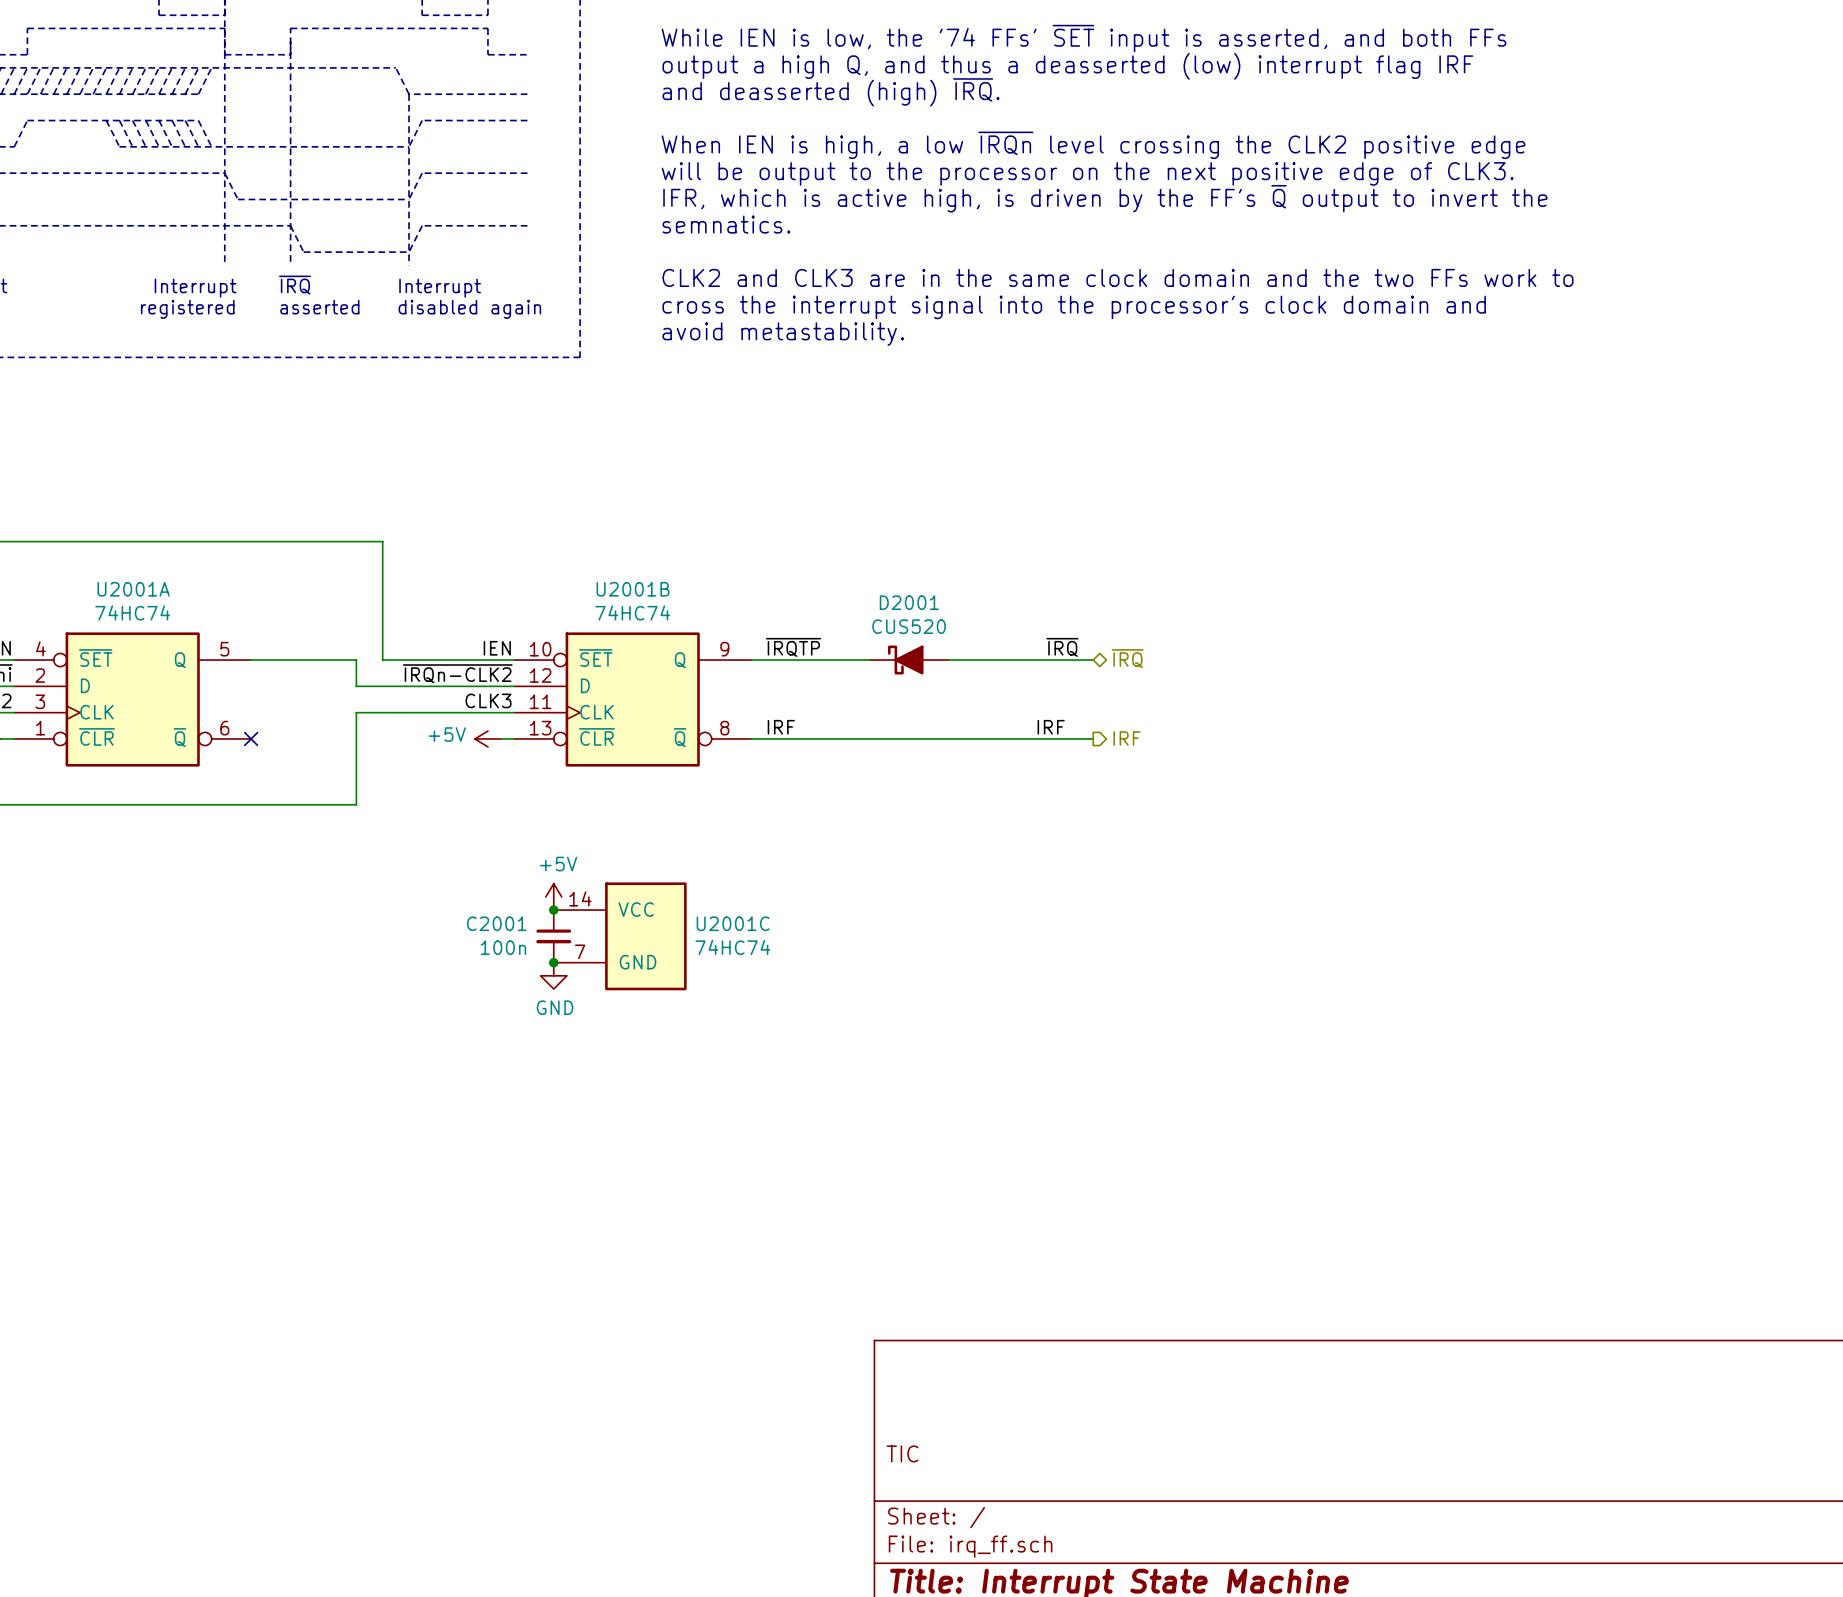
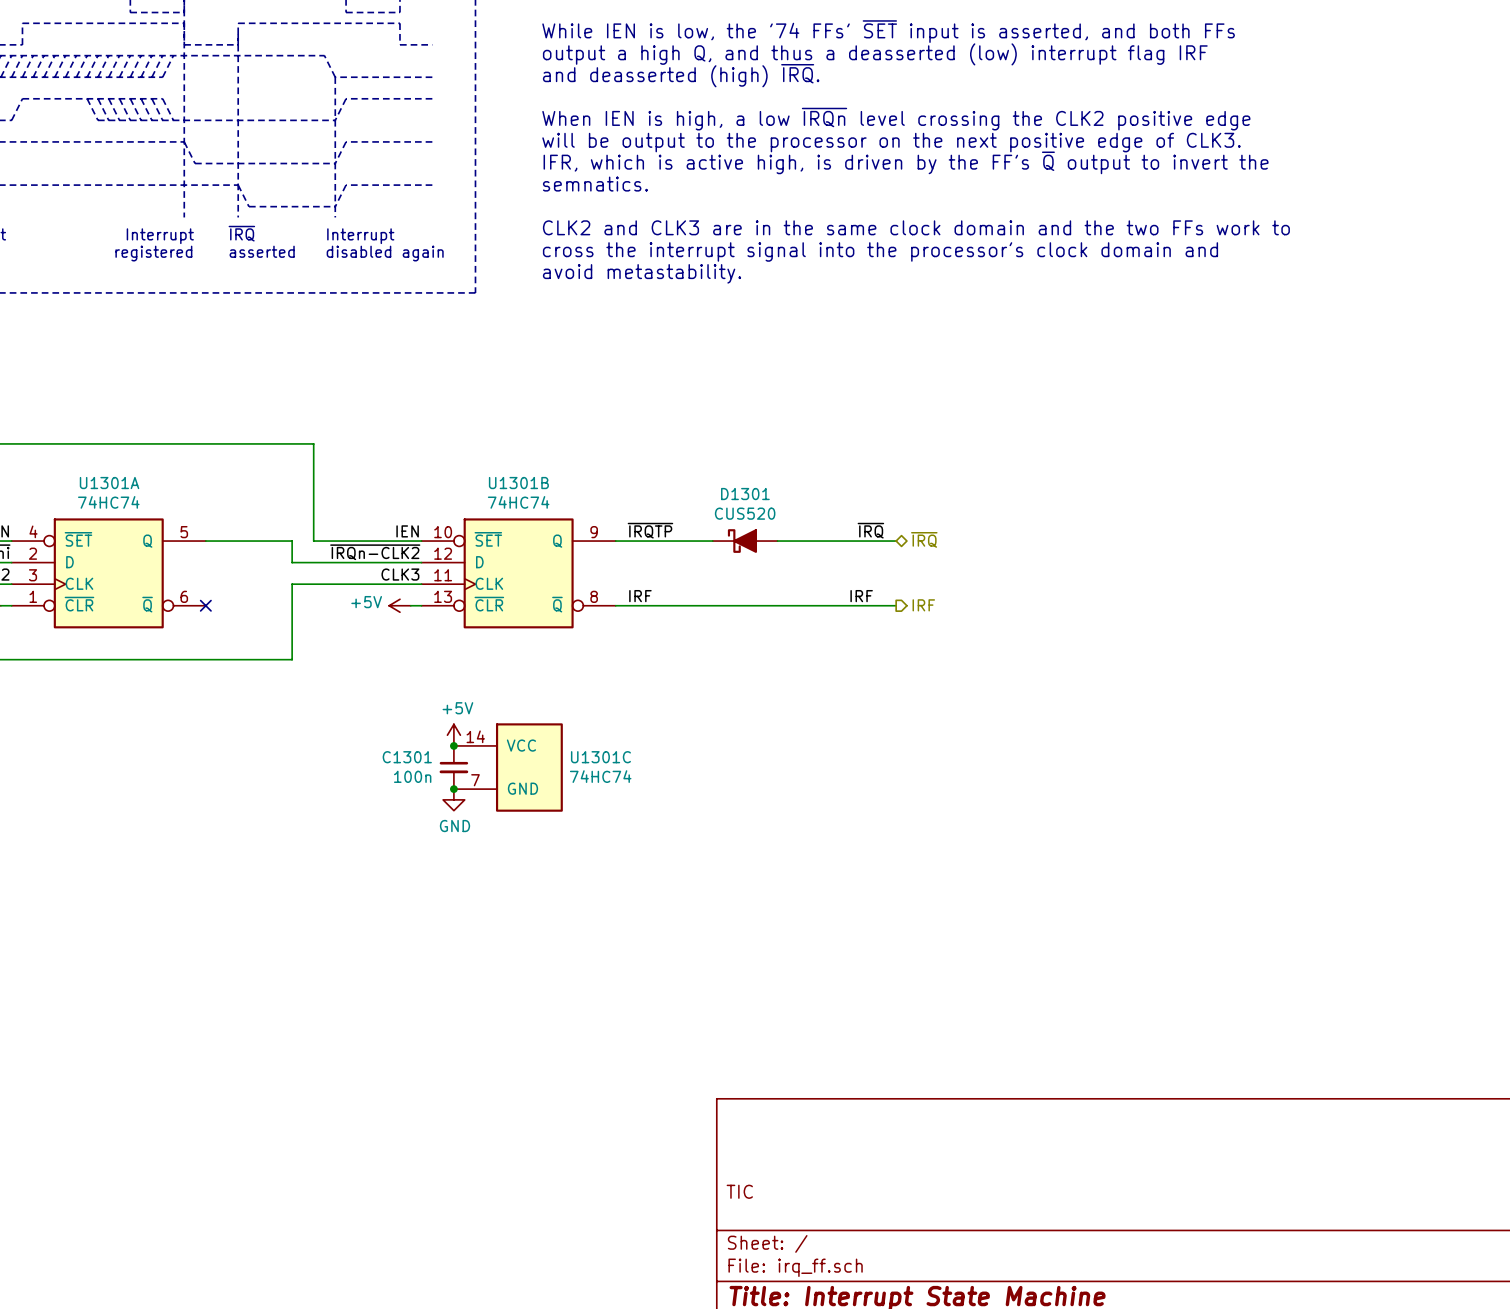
U2001A name: U2001A (133, 589) -> U1301A (109, 483)
U2001B name: U2001B (633, 589) -> U1301B (518, 483)
D2001 name: D2001 (909, 602) -> D1301 (745, 494)
C2001 name: C2001 (496, 923) -> C1301 (407, 757)
U2001C name: U2001C (733, 923) -> U1301C (600, 757)

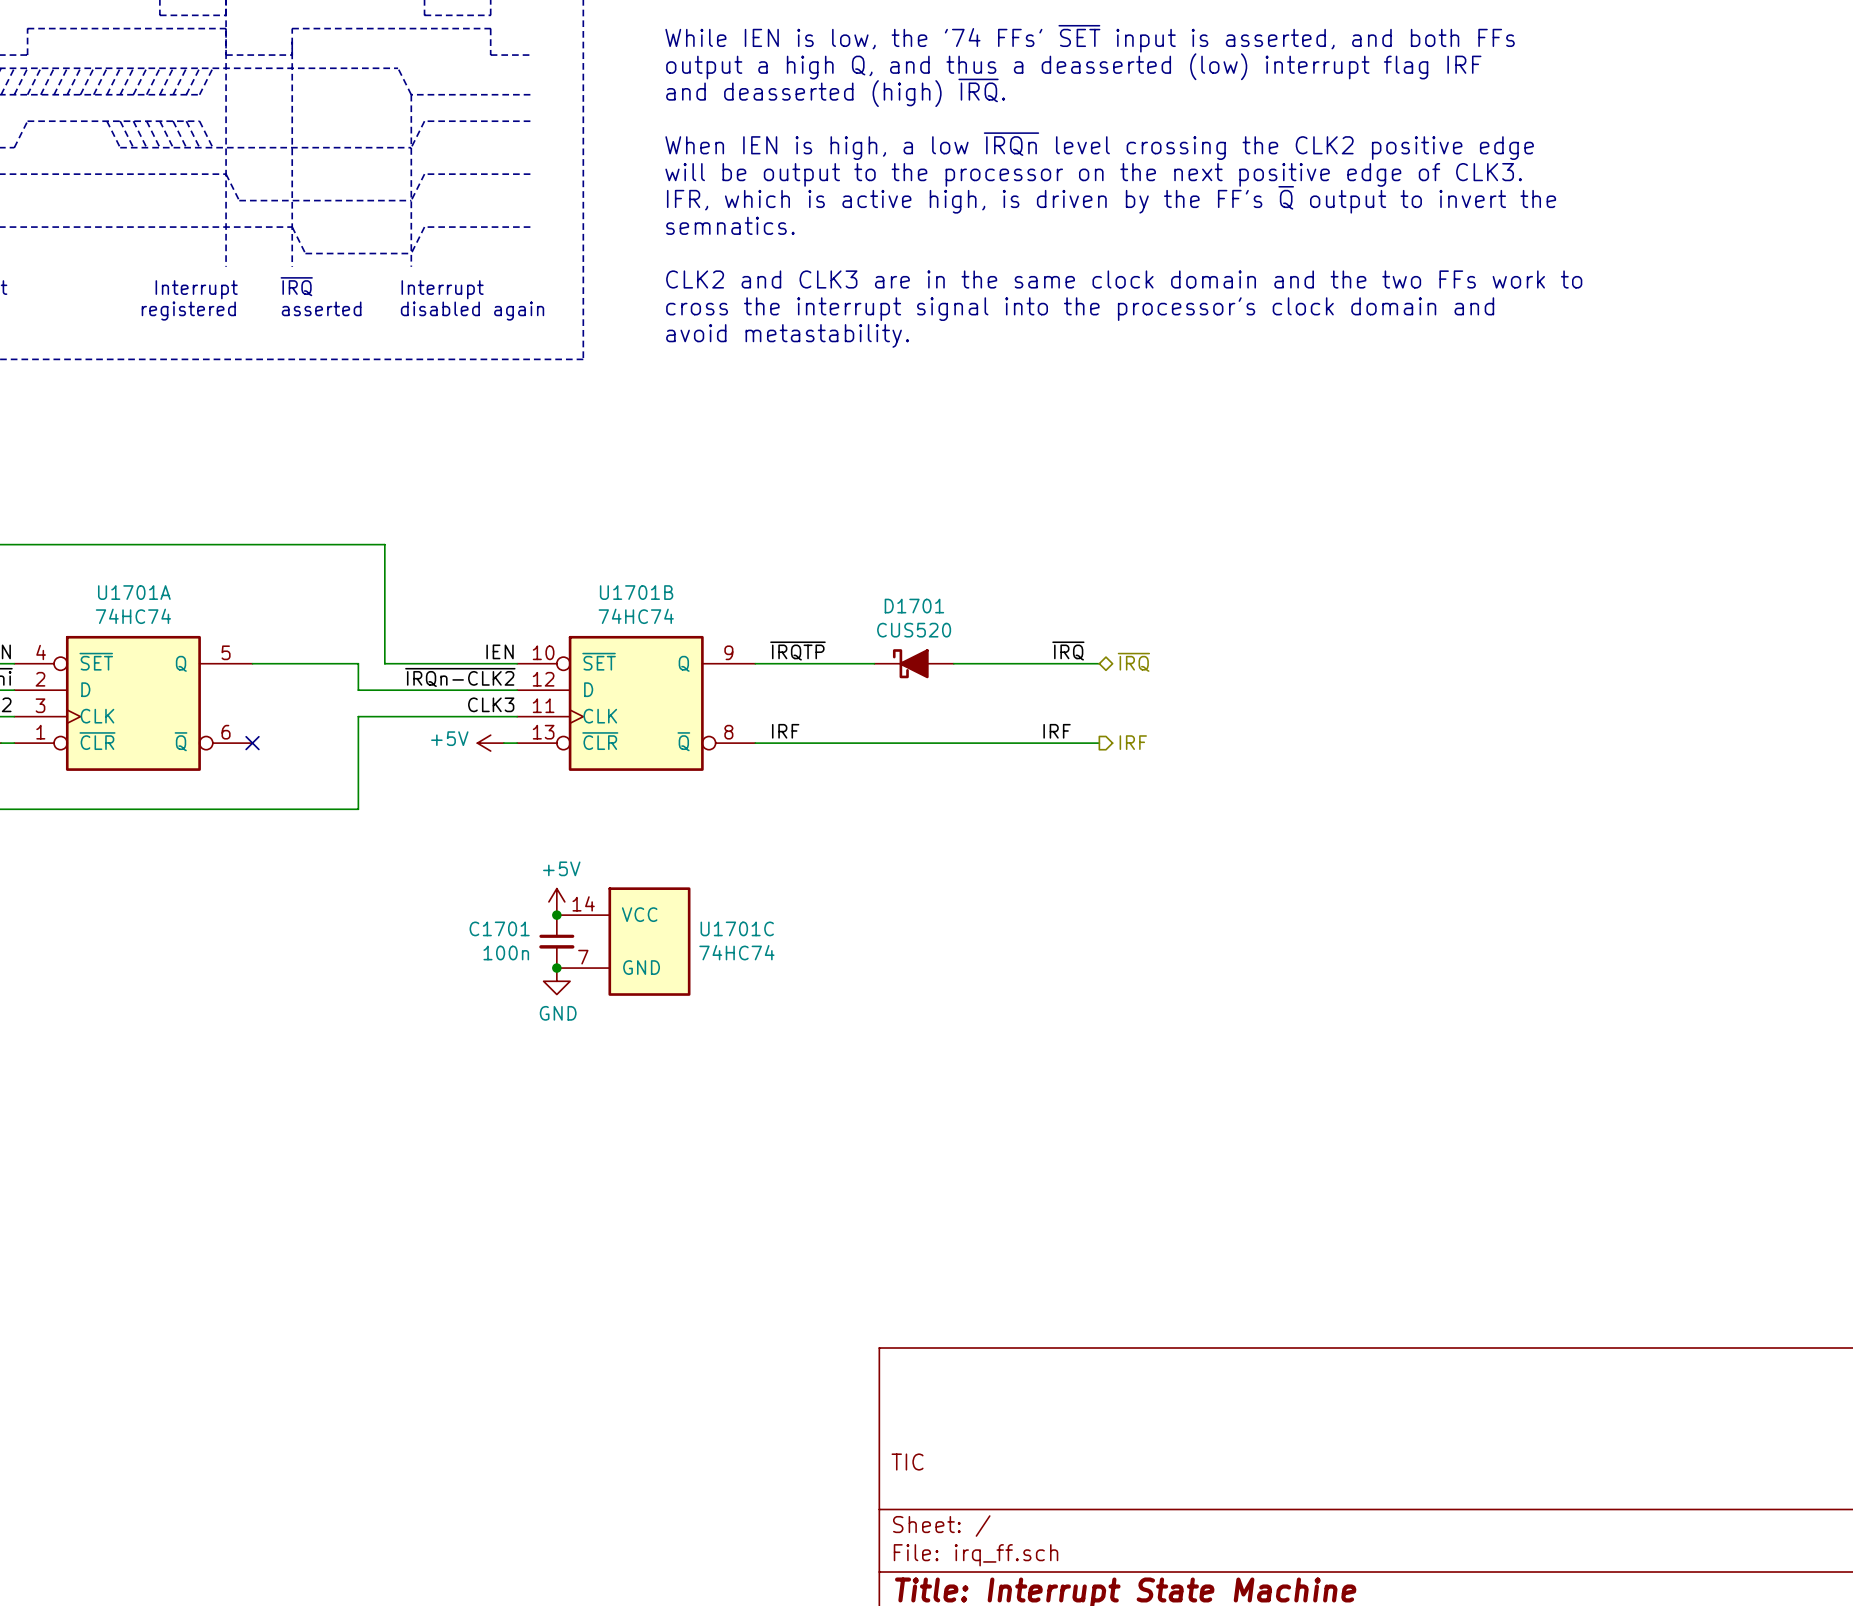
U1301A name: U1301A (109, 483) -> U1701A (134, 592)
U1301B name: U1301B (518, 483) -> U1701B (636, 592)
D1301 name: D1301 (745, 494) -> D1701 (914, 606)
C1301 name: C1301 (407, 757) -> C1701 (499, 928)
U1301C name: U1301C (600, 757) -> U1701C (737, 928)

